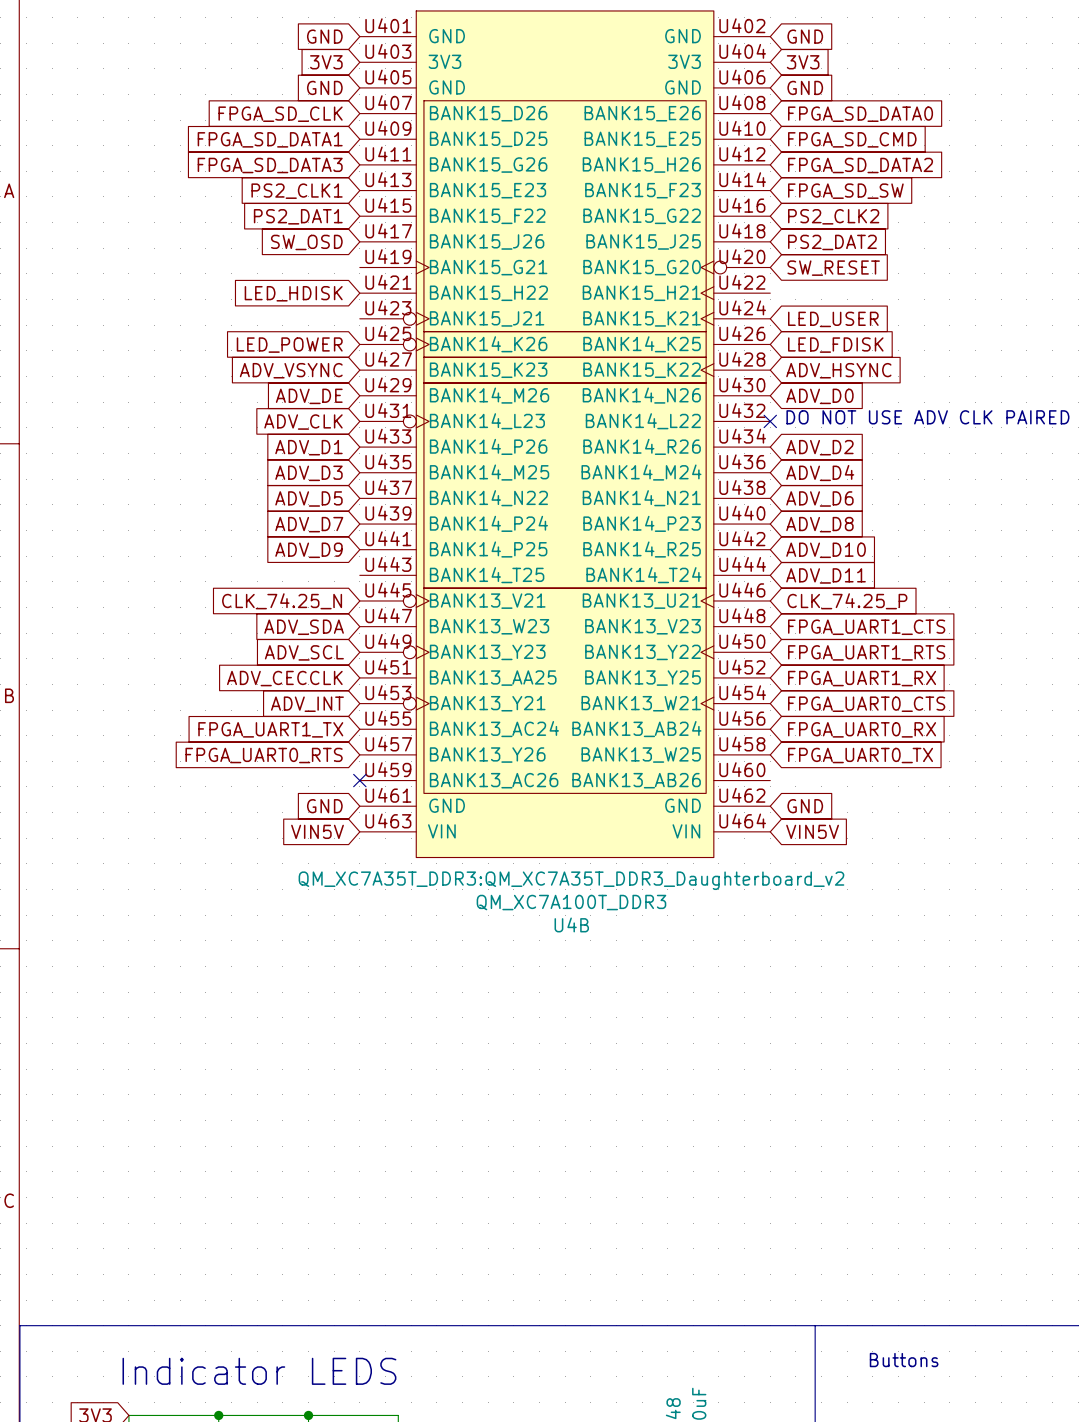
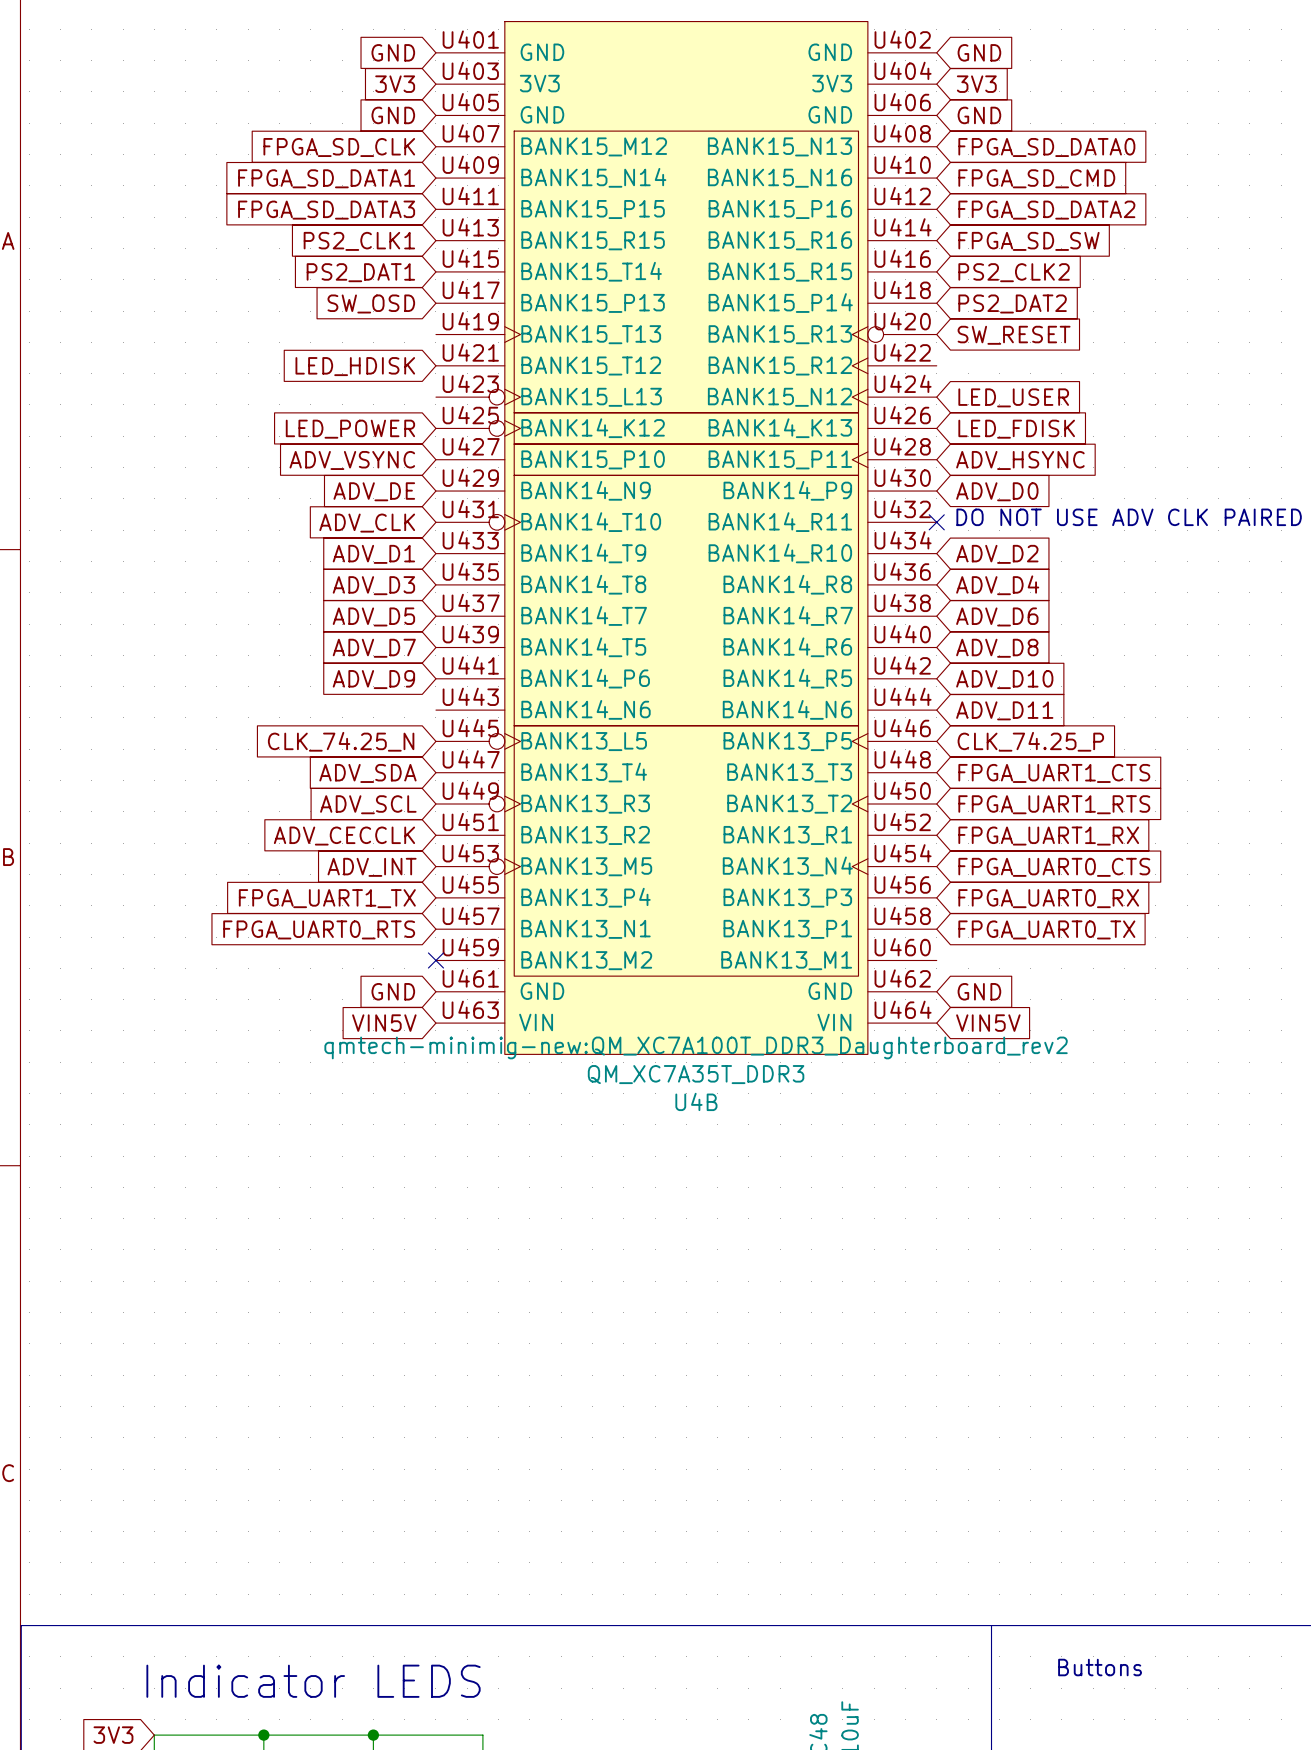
U4B symbol: [359, 10, 771, 858] -> [435, 21, 937, 1055]
U4B text: QM_XC7A35T_DDR3:QM_XC7A35T_DDR3_Daughterboard_v2 (571, 880) -> qmtech-minimig-new:QM_XC7A100T_DDR3_Daughterboard_rev2 (696, 1047)
U4B value: QM_XC7A100T_DDR3 (571, 902) -> QM_XC7A35T_DDR3 (696, 1074)
U4B name position: U4B (571, 924) -> U4B (696, 1101)

